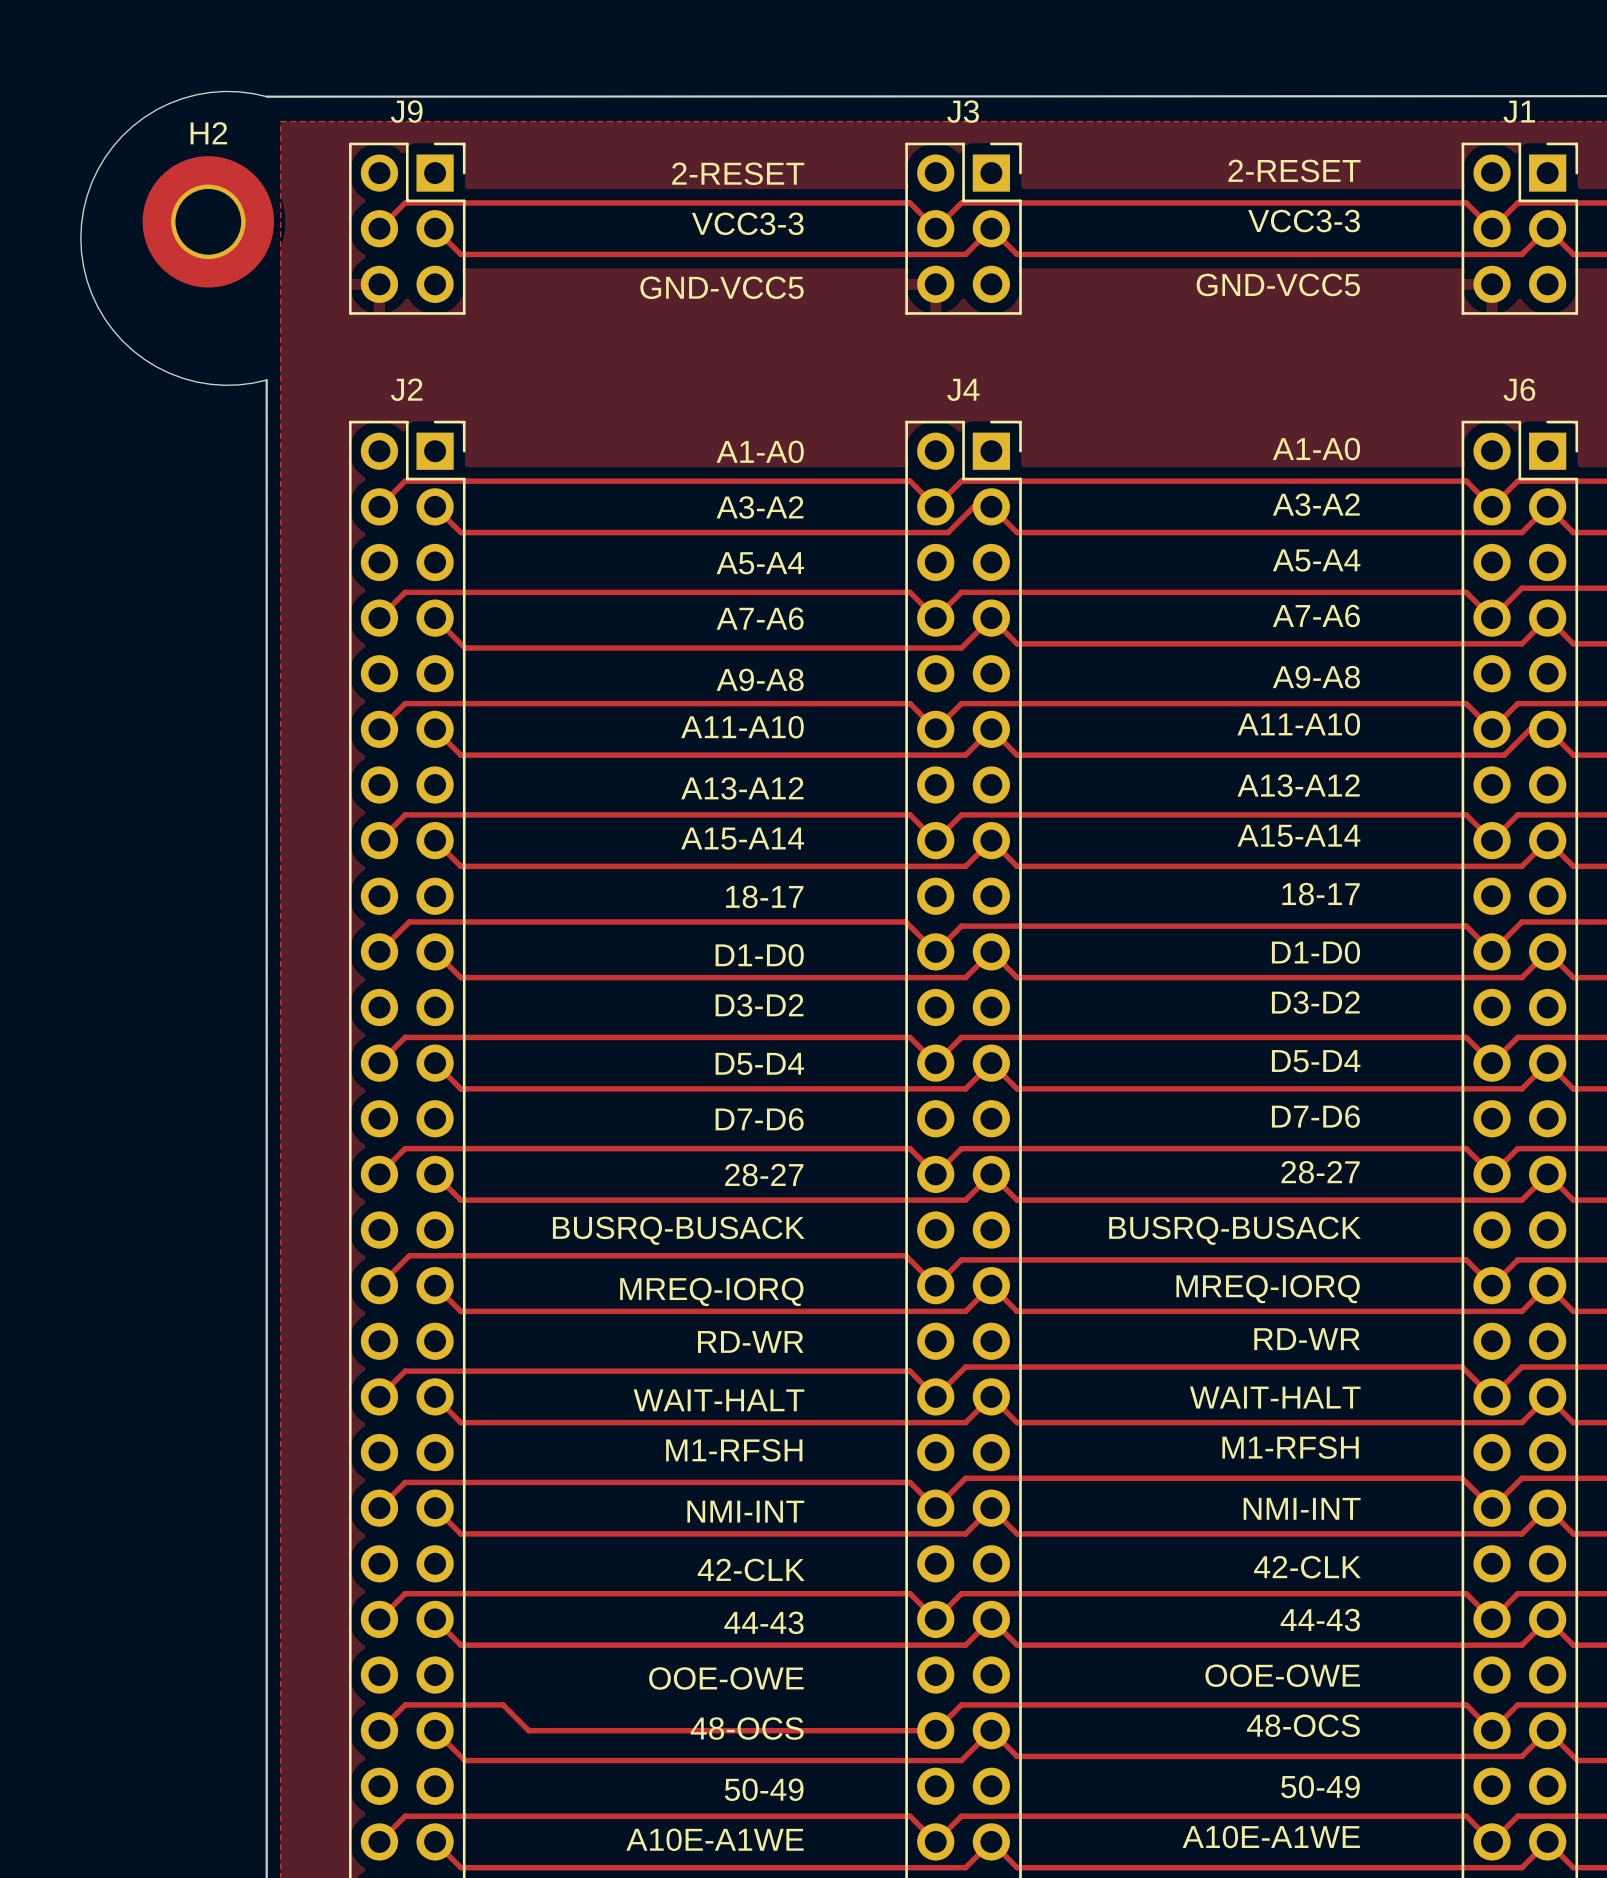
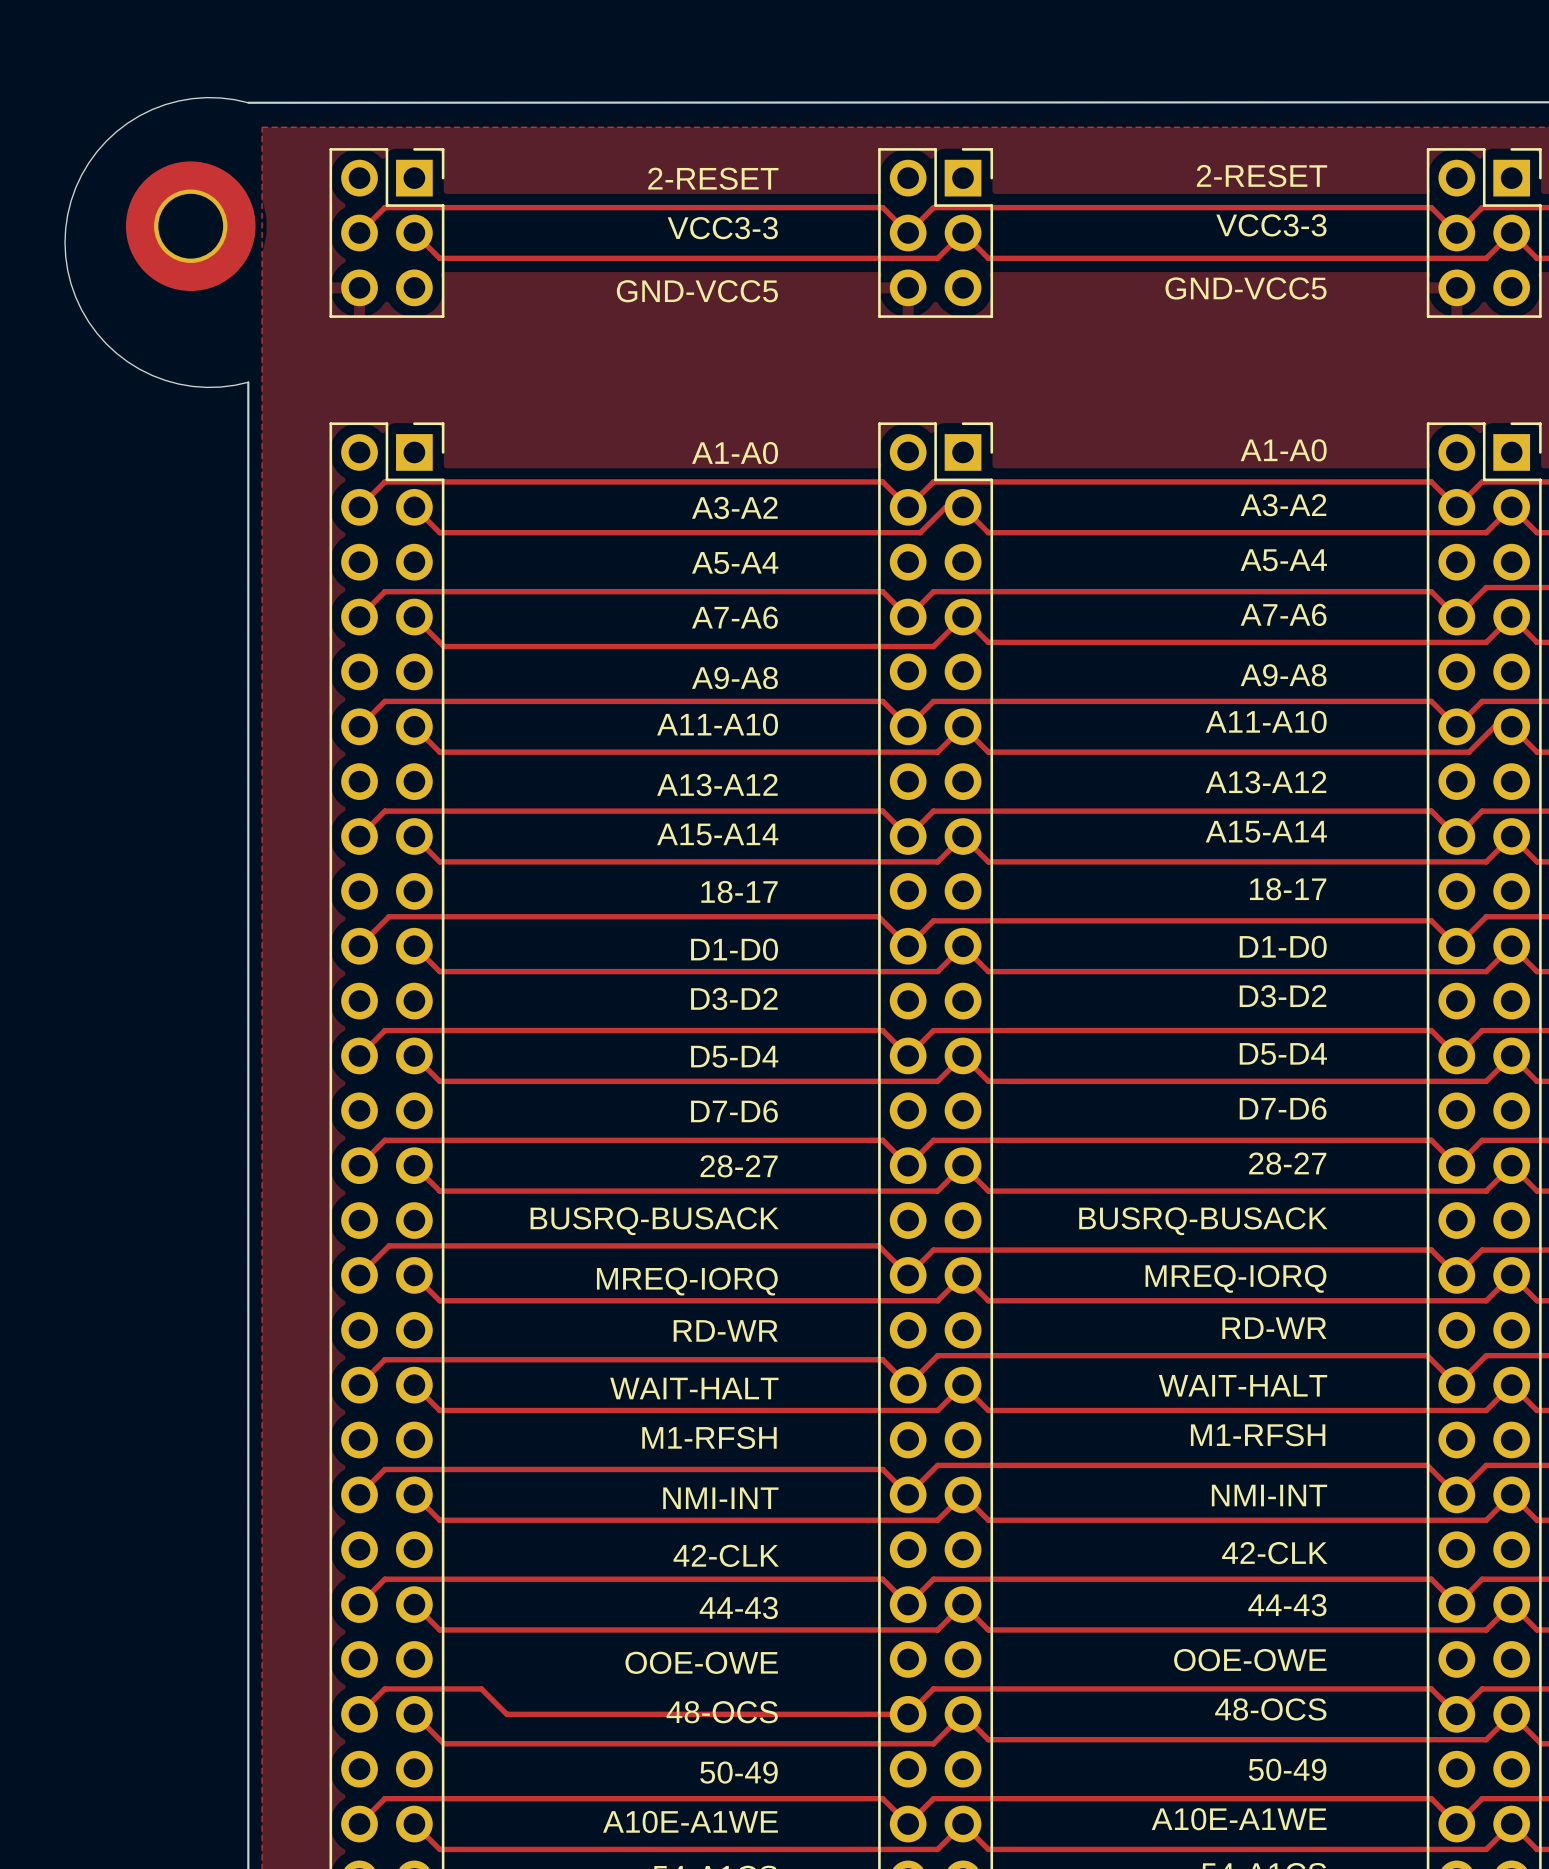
J9 name: J9 (406, 111) -> none
J3 name: J3 (963, 111) -> none
J1 name: J1 (1519, 111) -> none
H2 name: H2 (208, 133) -> none
J2 name: J2 (406, 389) -> none
J4 name: J4 (963, 389) -> none
J6 name: J6 (1519, 389) -> none

